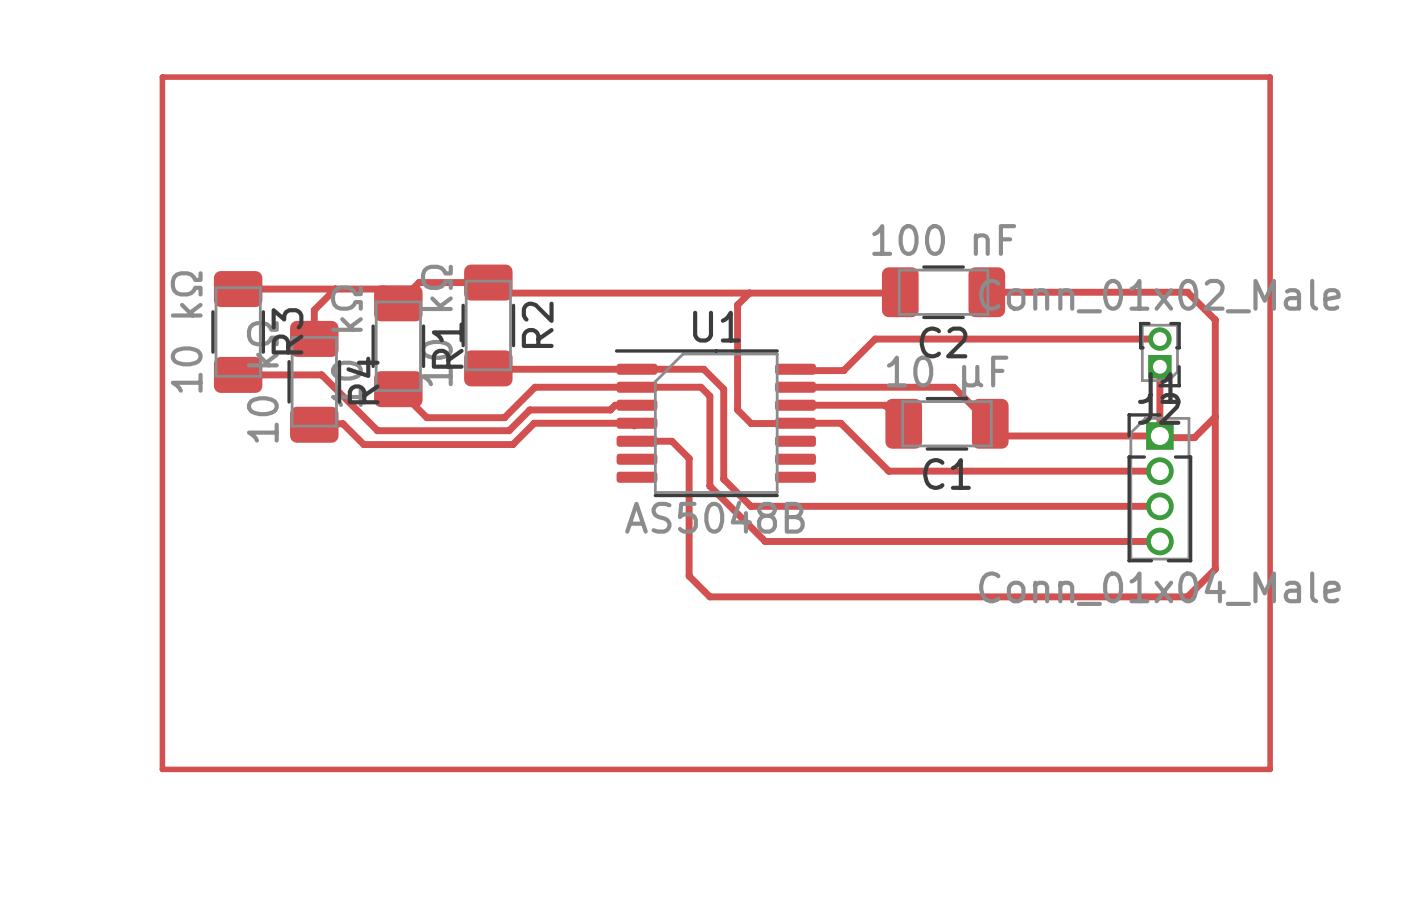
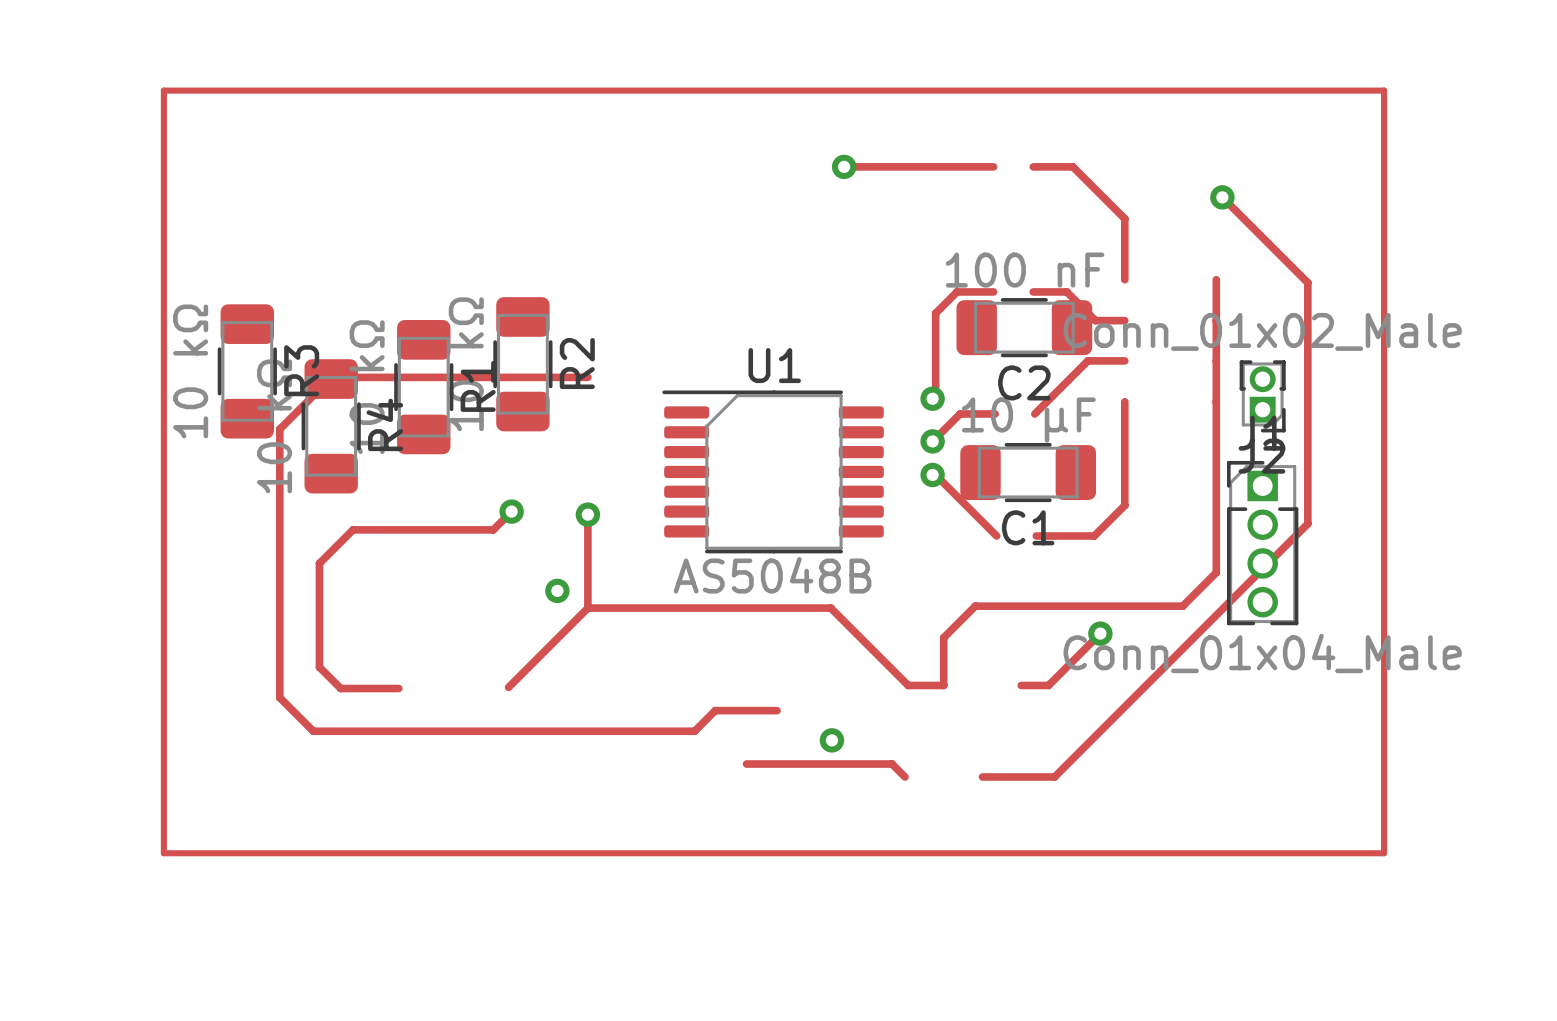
track: none -> (844, 166) (993, 166)
via: none -> (844, 166)
track: none -> (1033, 166) (1072, 166) (1124, 218) (1124, 279)
track: none -> (1222, 197) (1307, 282) (1307, 523) (1054, 776) (982, 776)
via: none -> (1222, 197)
track: none -> (1216, 279) (1216, 572) (1182, 606) (975, 606) (943, 637) (943, 685) (908, 685) (830, 608) (587, 608)
track: none -> (993, 291) (957, 291) (935, 313) (935, 395) (932, 398)
track: none -> (1033, 291) (1066, 291) (1095, 320) (1124, 320)
track: (993, 285) (986, 292) (1187, 292) (1215, 319) (1215, 569) (1187, 596) (709, 596) (689, 576) (689, 458) (671, 441) (636, 441) -> none
track: (238, 289) (384, 289) (398, 303) (419, 282) (488, 282) (498, 293) (900, 292) -> none
track: (335, 289) (314, 310) (314, 338) -> none
track: (749, 293) (737, 304) (737, 409) -> none
track: none -> (1124, 360) (1087, 360) (1034, 413)
track: none -> (587, 377) (331, 377) (279, 429) (279, 697) (313, 731) (694, 731) (715, 710) (777, 710)
track: (1159, 339) (875, 339) (843, 370) (795, 369) -> none
via: none -> (932, 398)
track: none -> (1124, 401) (1124, 505) (1094, 536) (1036, 536)
track: (1159, 366) (1159, 435) -> none
track: (488, 368) (703, 369) (723, 389) (723, 479) (750, 506) (1159, 506) -> none
track: none -> (995, 413) (960, 413) (932, 441)
track: (238, 374) (321, 374) (377, 430) (509, 430) (529, 409) (610, 409) (615, 405) (636, 404) -> none
track: (795, 387) (953, 387) (1002, 435) (1159, 435) -> none
track: (398, 389) (426, 417) (504, 417) (534, 387) (701, 387) (709, 396) (709, 486) (765, 541) (1159, 541) -> none
via: none -> (932, 441)
track: (795, 405) (885, 405) (903, 423) -> none
track: (737, 410) (751, 423) (795, 423) -> none
track: (1215, 416) (1194, 437) (1161, 437) (1159, 435) -> none
track: (315, 423) (342, 423) (363, 444) (512, 444) (534, 423) (636, 423) (634, 426) -> none
track: (795, 423) (840, 423) (888, 471) (1159, 471) -> none
track: none -> (932, 474) (935, 474) (996, 536)
via: none -> (932, 474)
track: none -> (511, 511) (493, 529) (353, 529) (319, 563) (319, 667) (340, 688) (398, 688)
via: none -> (511, 511)
track: none -> (587, 514) (587, 608)
via: none -> (587, 514)
via: none -> (557, 590)
track: none -> (587, 608) (508, 687)
track: none -> (1100, 633) (1048, 685) (1021, 685)
via: none -> (1100, 633)
via: none -> (831, 740)
track: none -> (746, 764) (892, 764) (905, 776)

